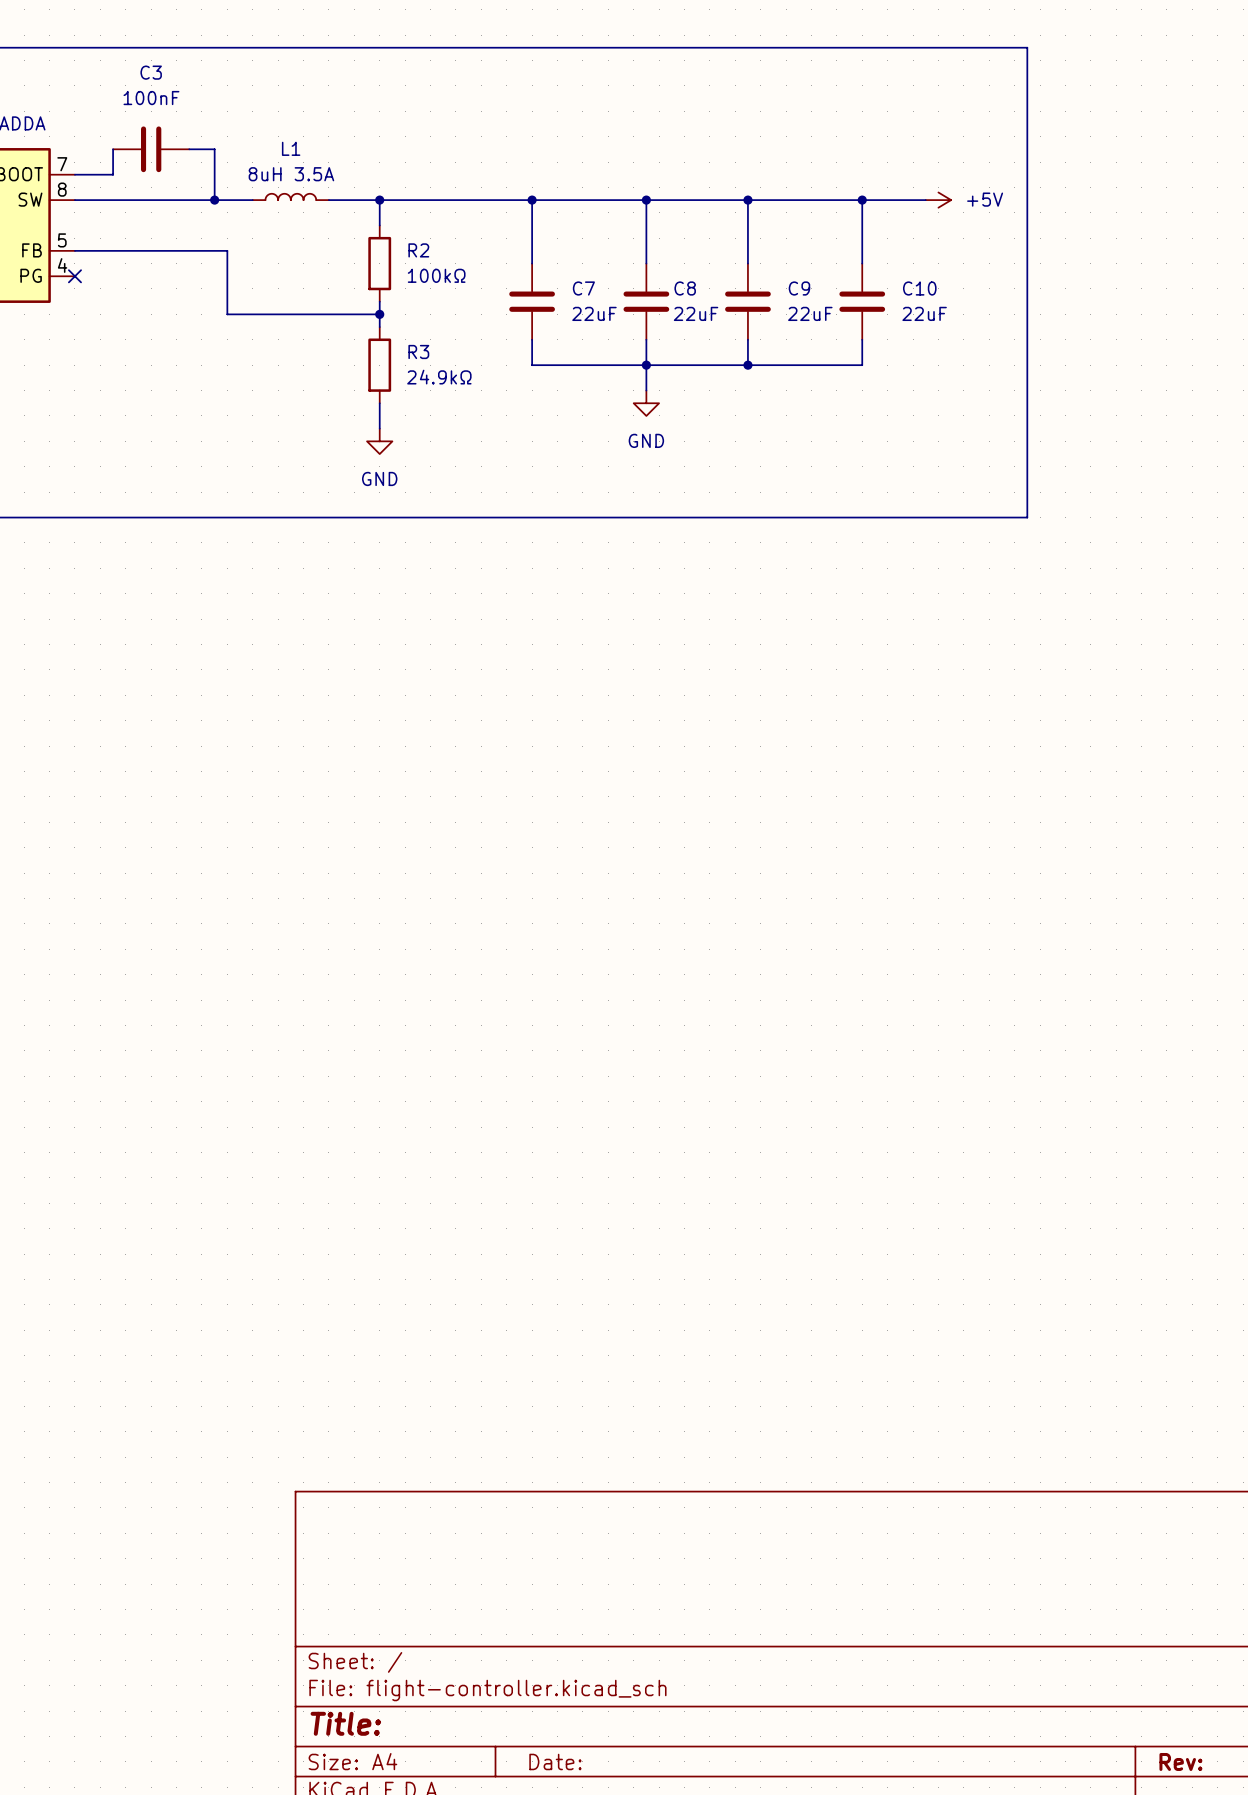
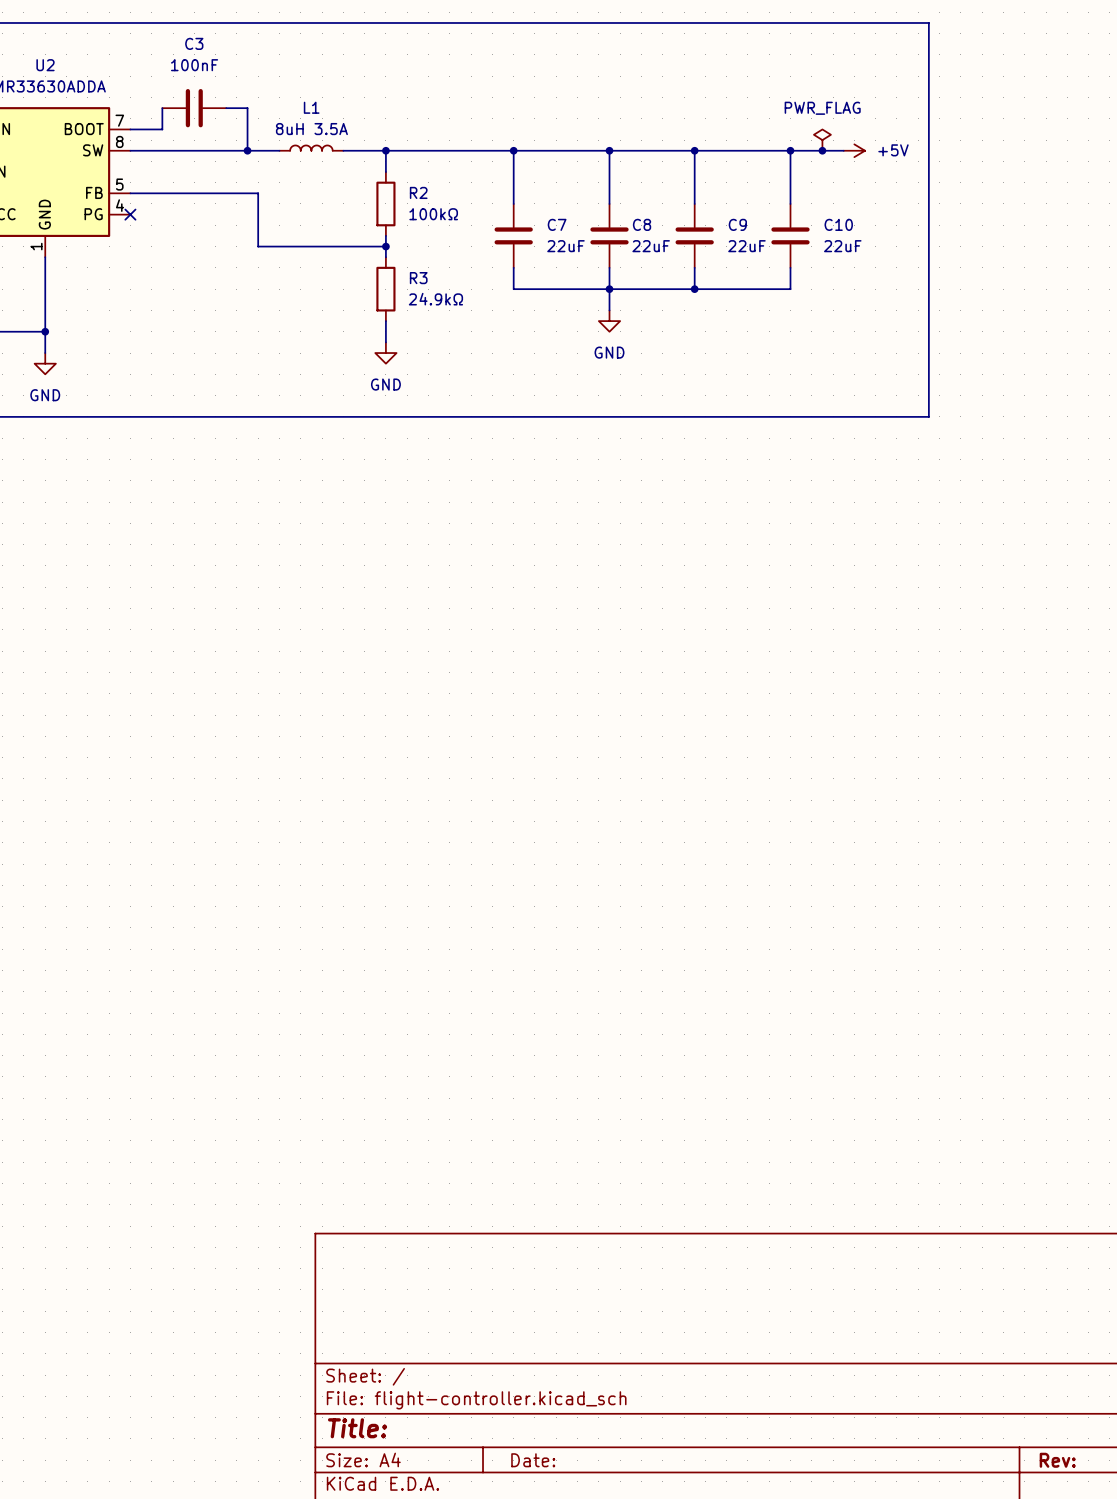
power symbol: none -> PWR_FLAG (822, 140)
junction: none -> (822, 150)

